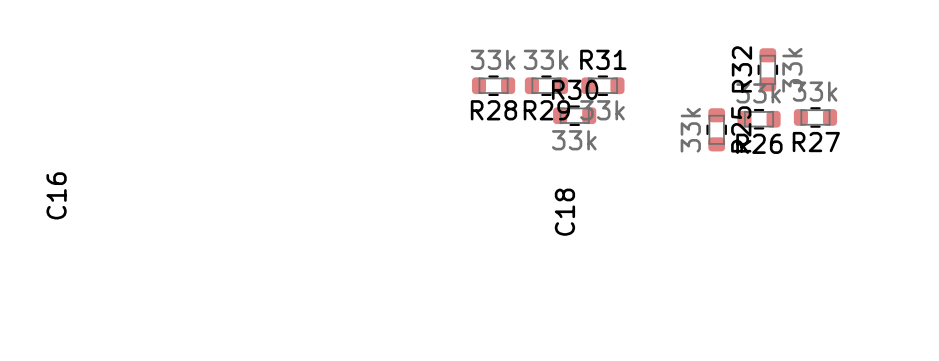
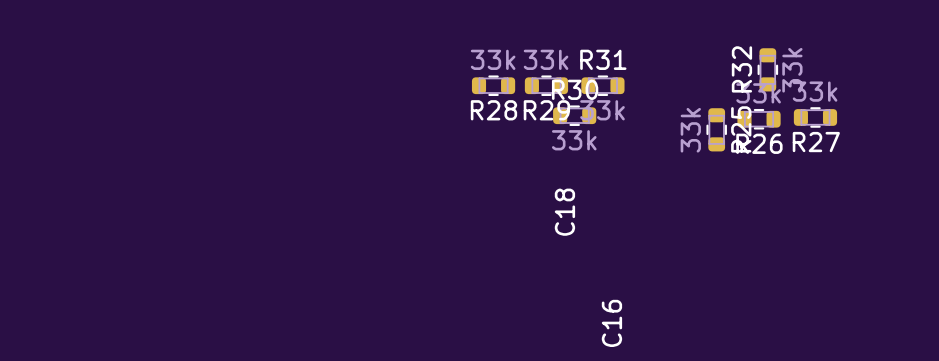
C16 name position: C16 (56, 195) -> C16 (611, 323)

